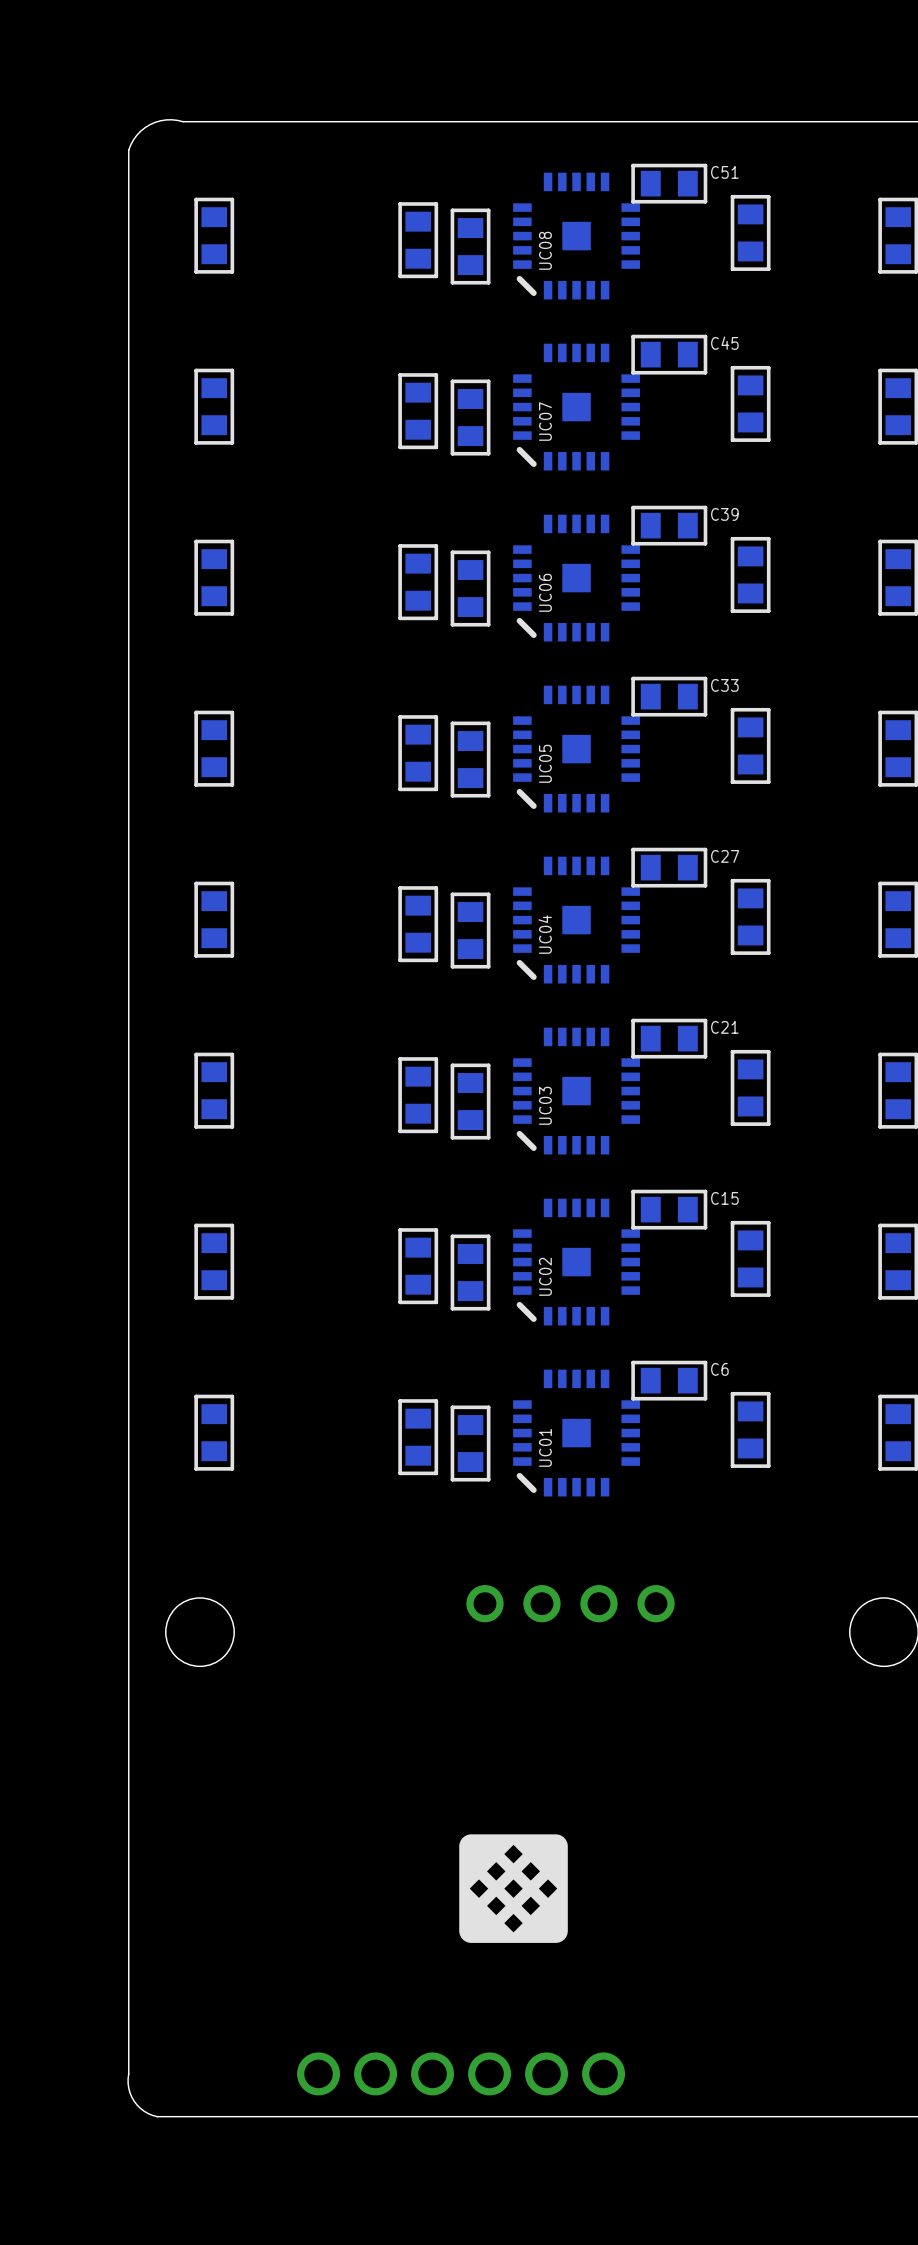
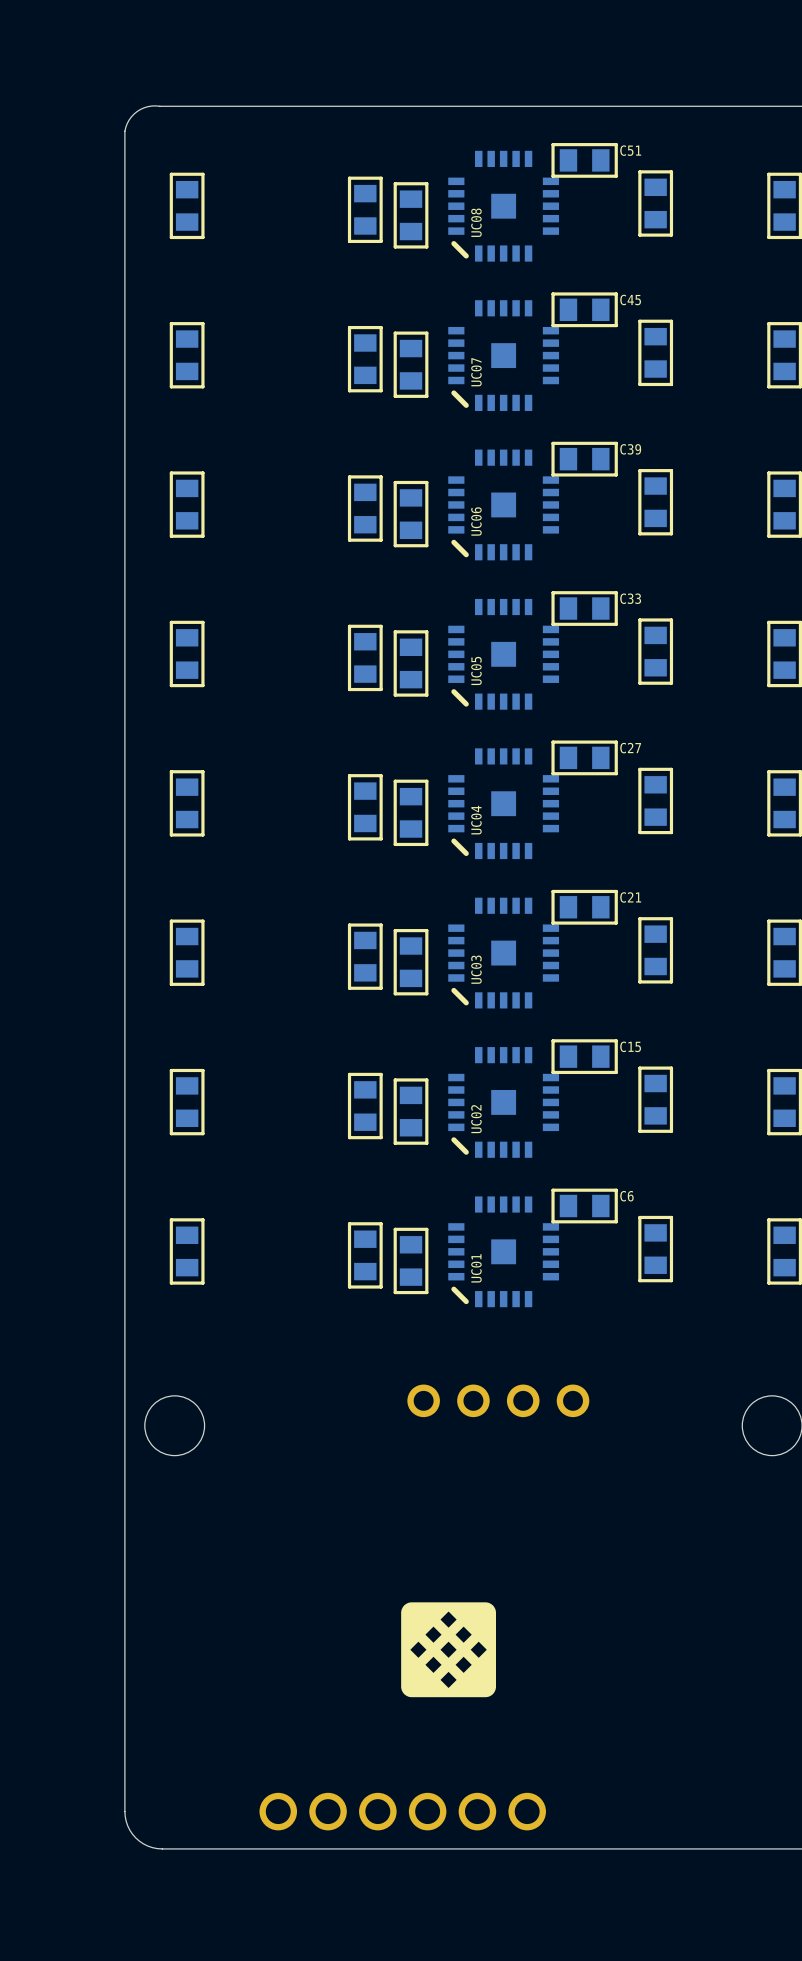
board edge: (182, 121) (166, 119) (149, 124) (136, 135) (128, 150) (128, 2083) (134, 2101) (148, 2113) (157, 2116) (185, 2116) -> (159, 106) (147, 106) (137, 111) (129, 120) (124, 131) (124, 1811) (127, 1825) (135, 1838) (147, 1846) (162, 1848)

